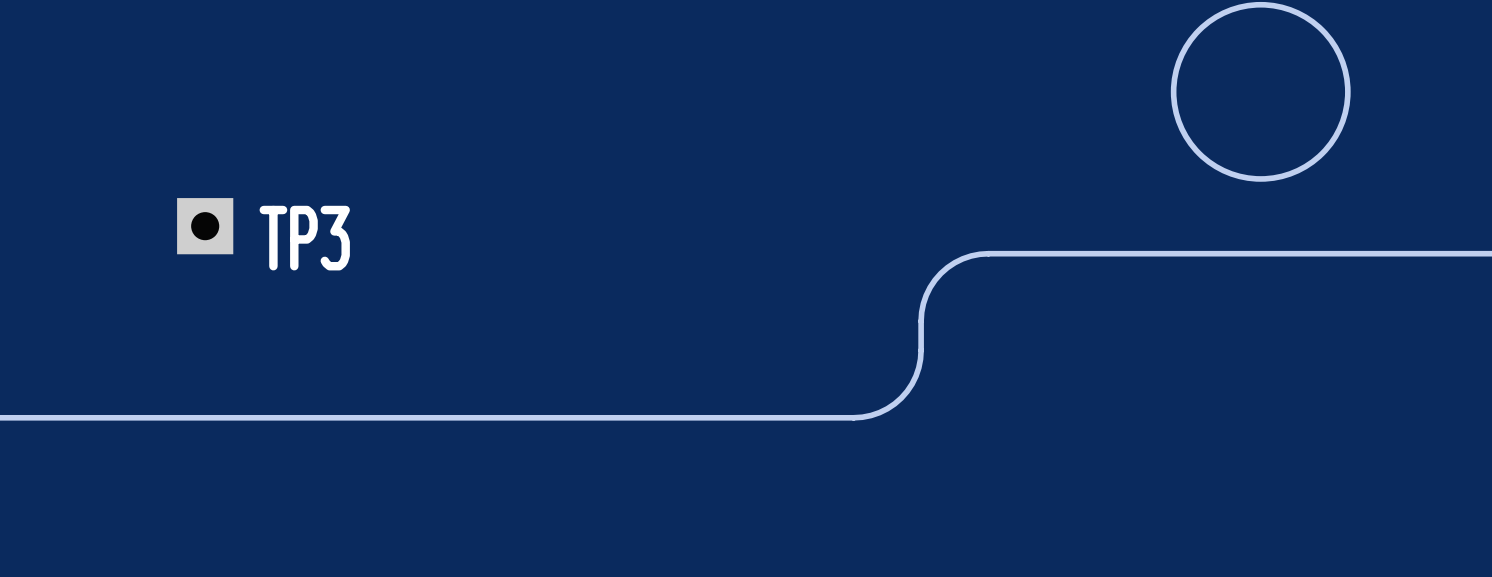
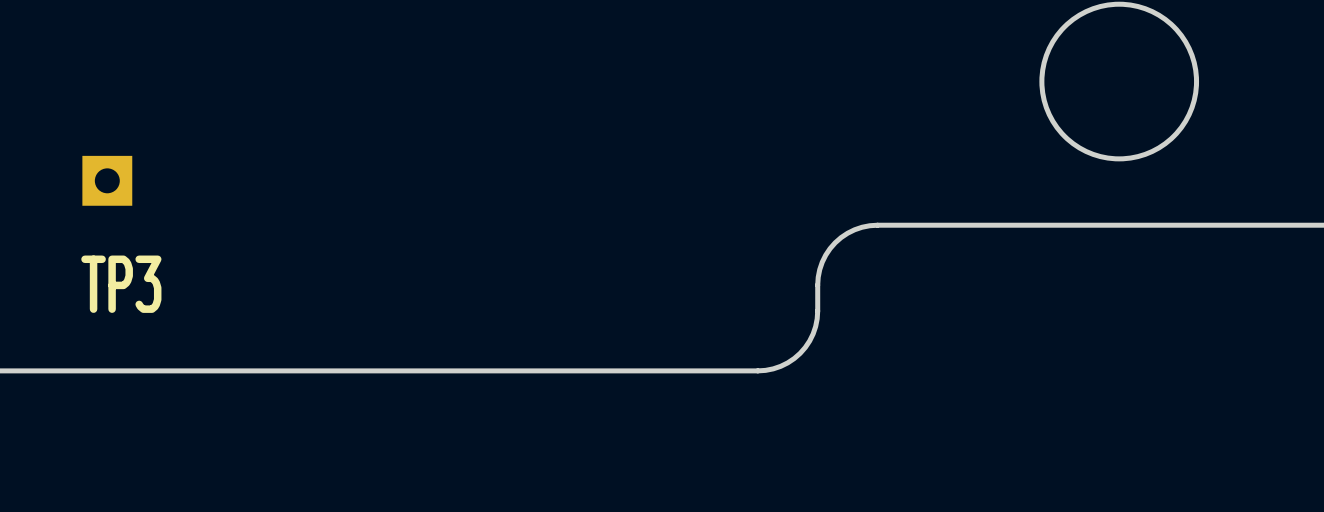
TP3 position: (205, 226) -> (107, 180)
TP3 name position: TP3 (304, 238) -> TP3 (121, 284)

